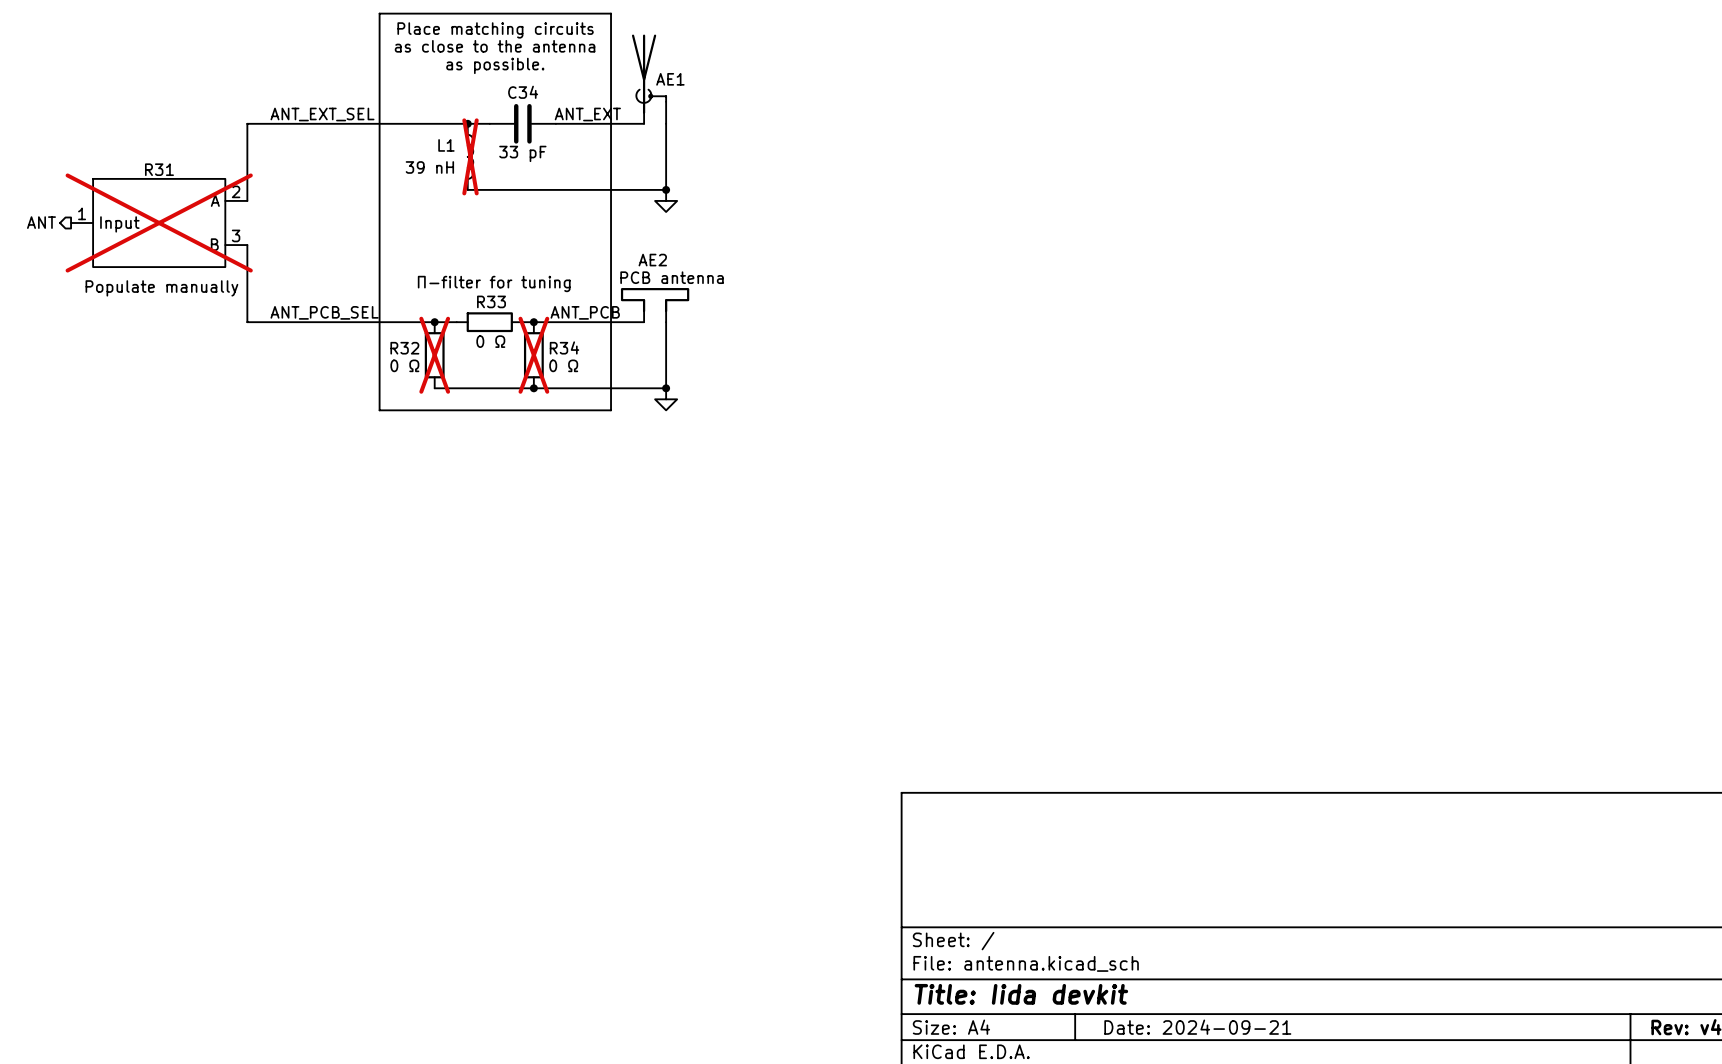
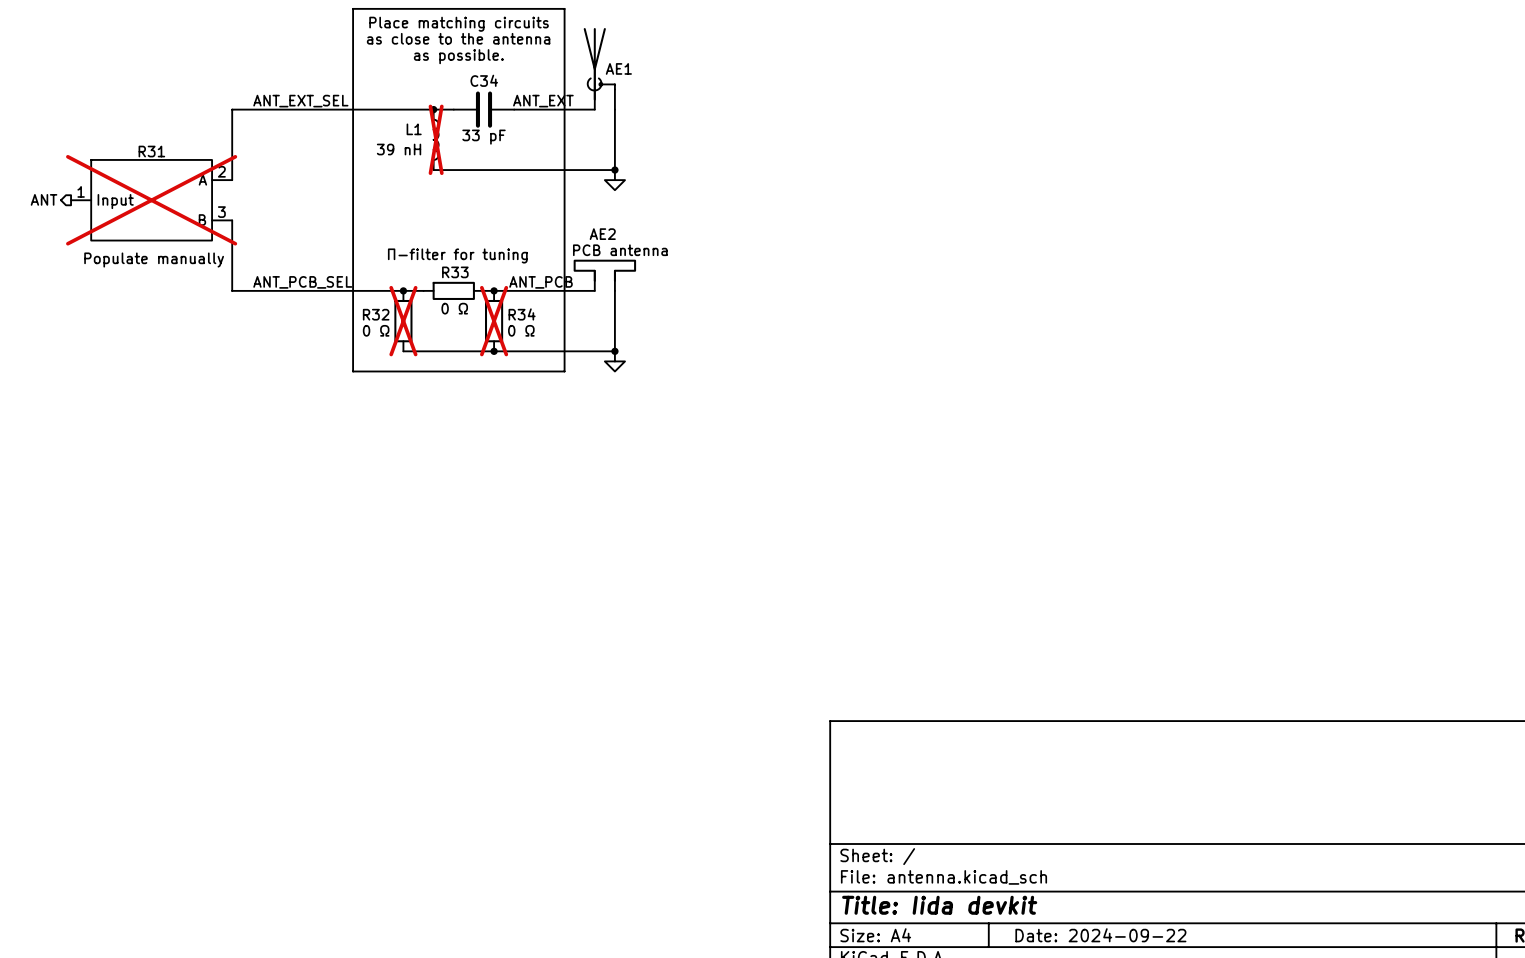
title block: Date: 2024-09-21 (1197, 1027) -> Date: 2024-09-22 (1100, 935)

